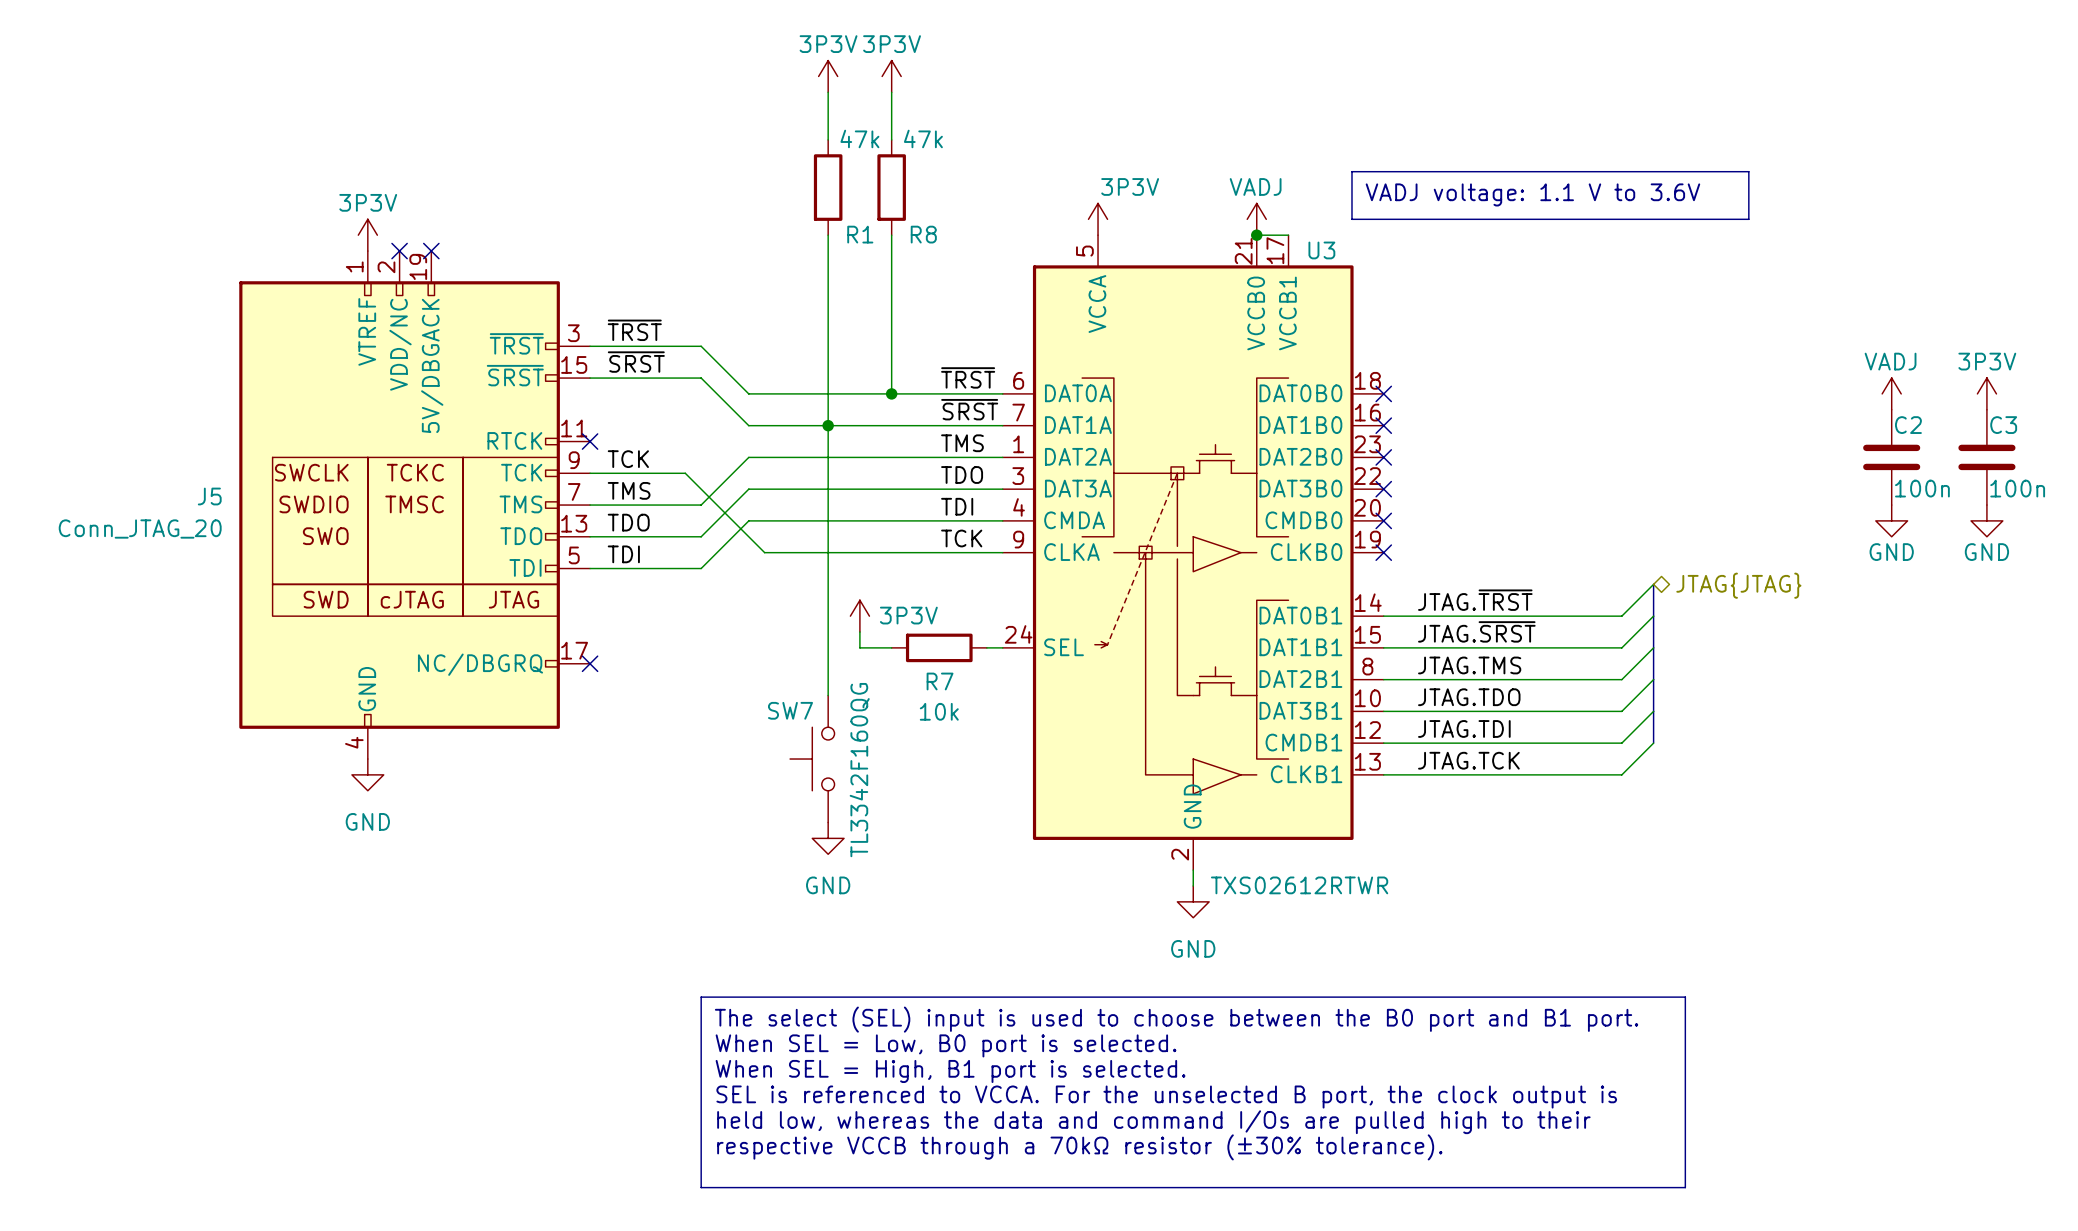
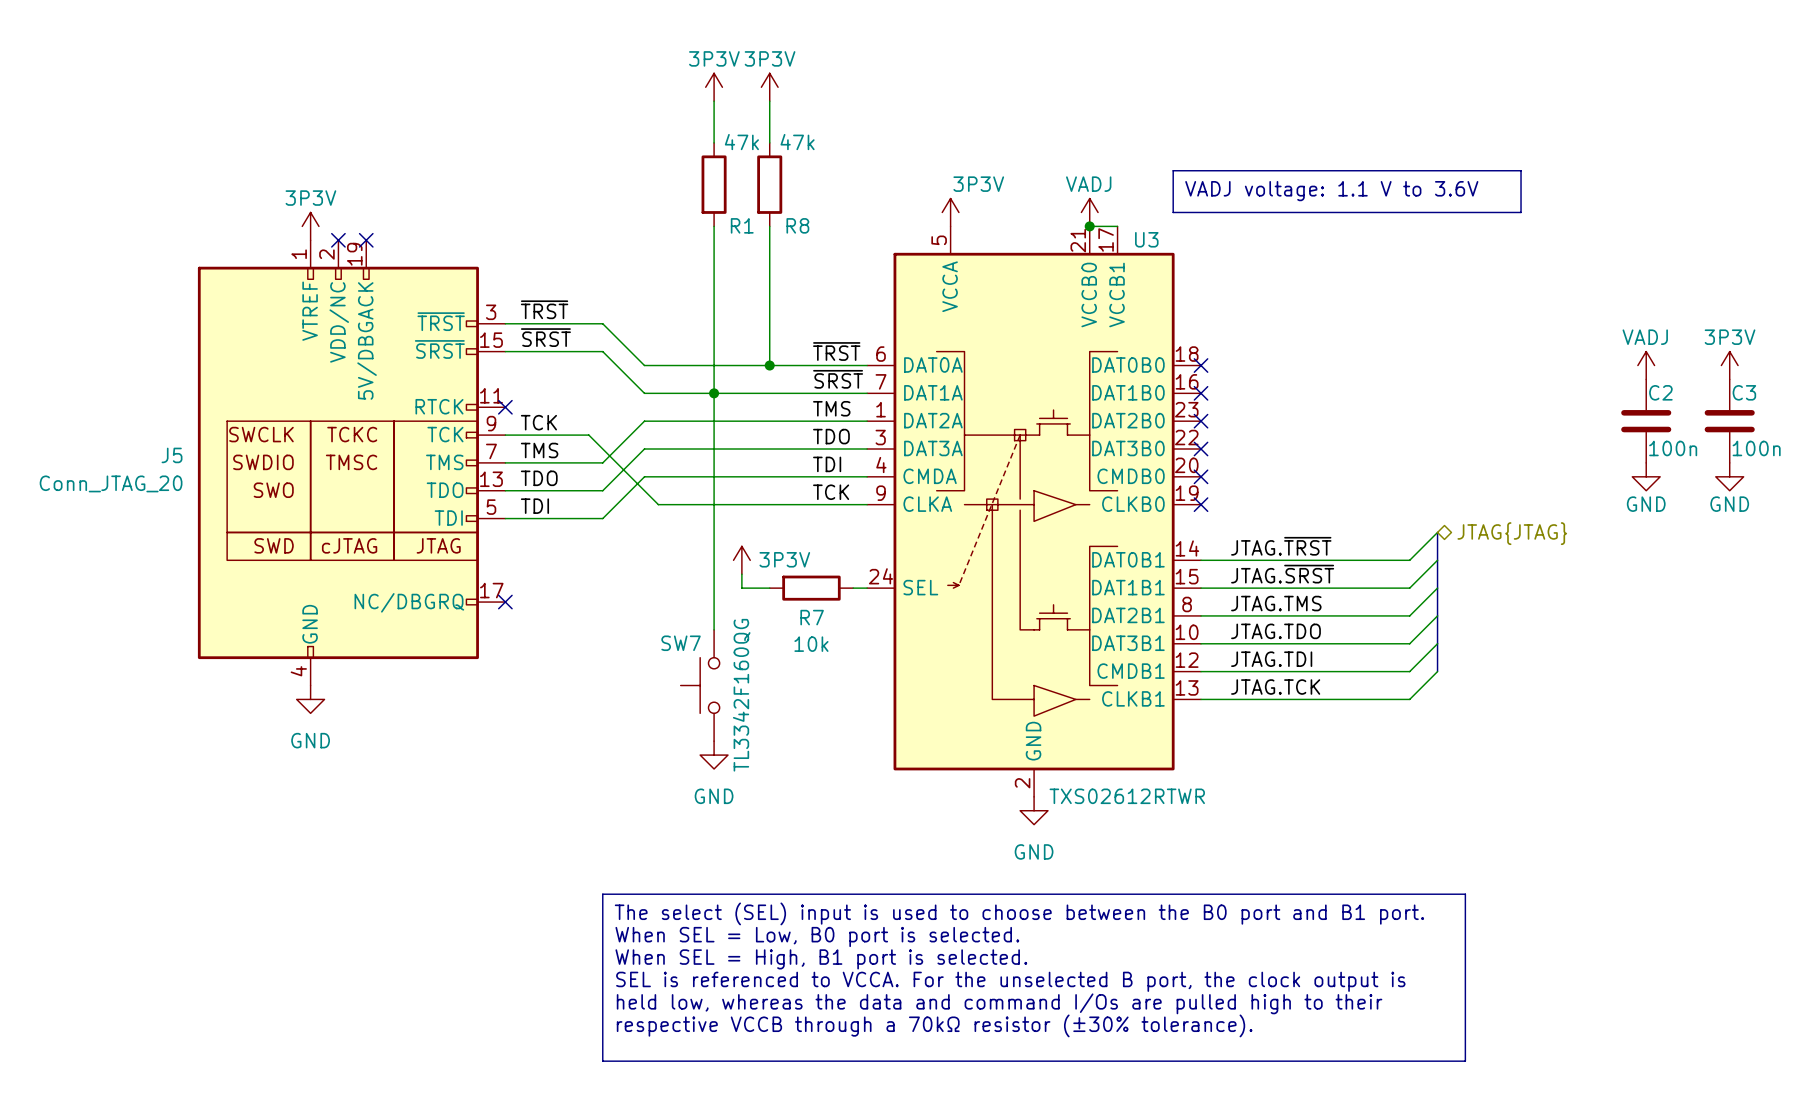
U3 symbol: [1002, 235, 1384, 871] -> [867, 226, 1202, 797]

